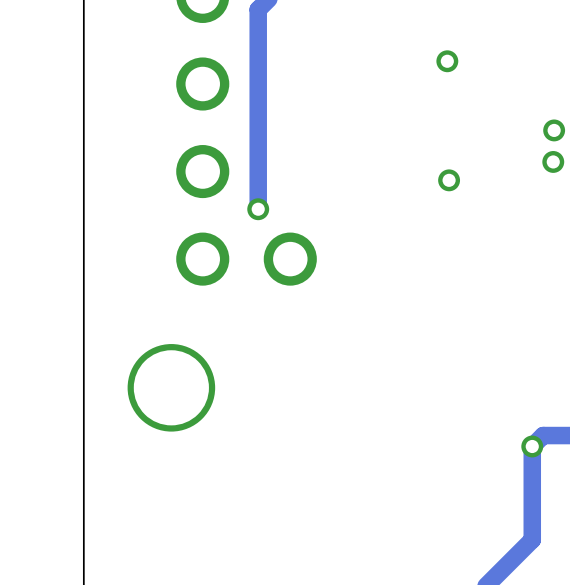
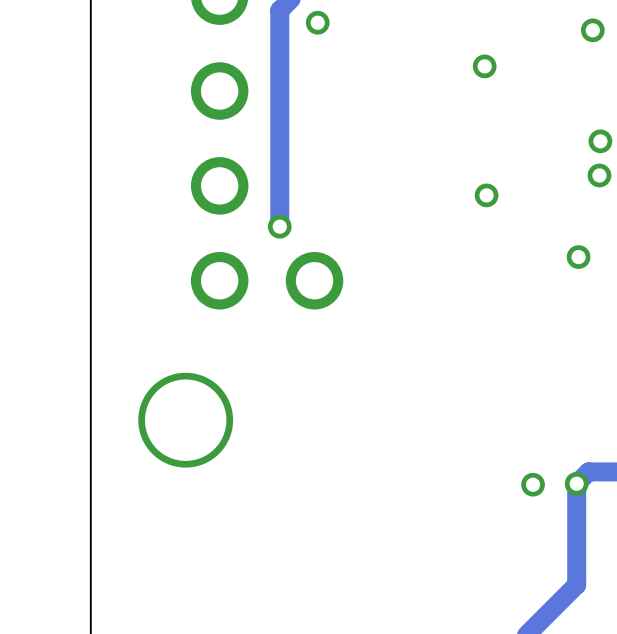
via: none -> (317, 22)
via: none -> (592, 30)
via: none -> (578, 257)
via: none -> (533, 484)

